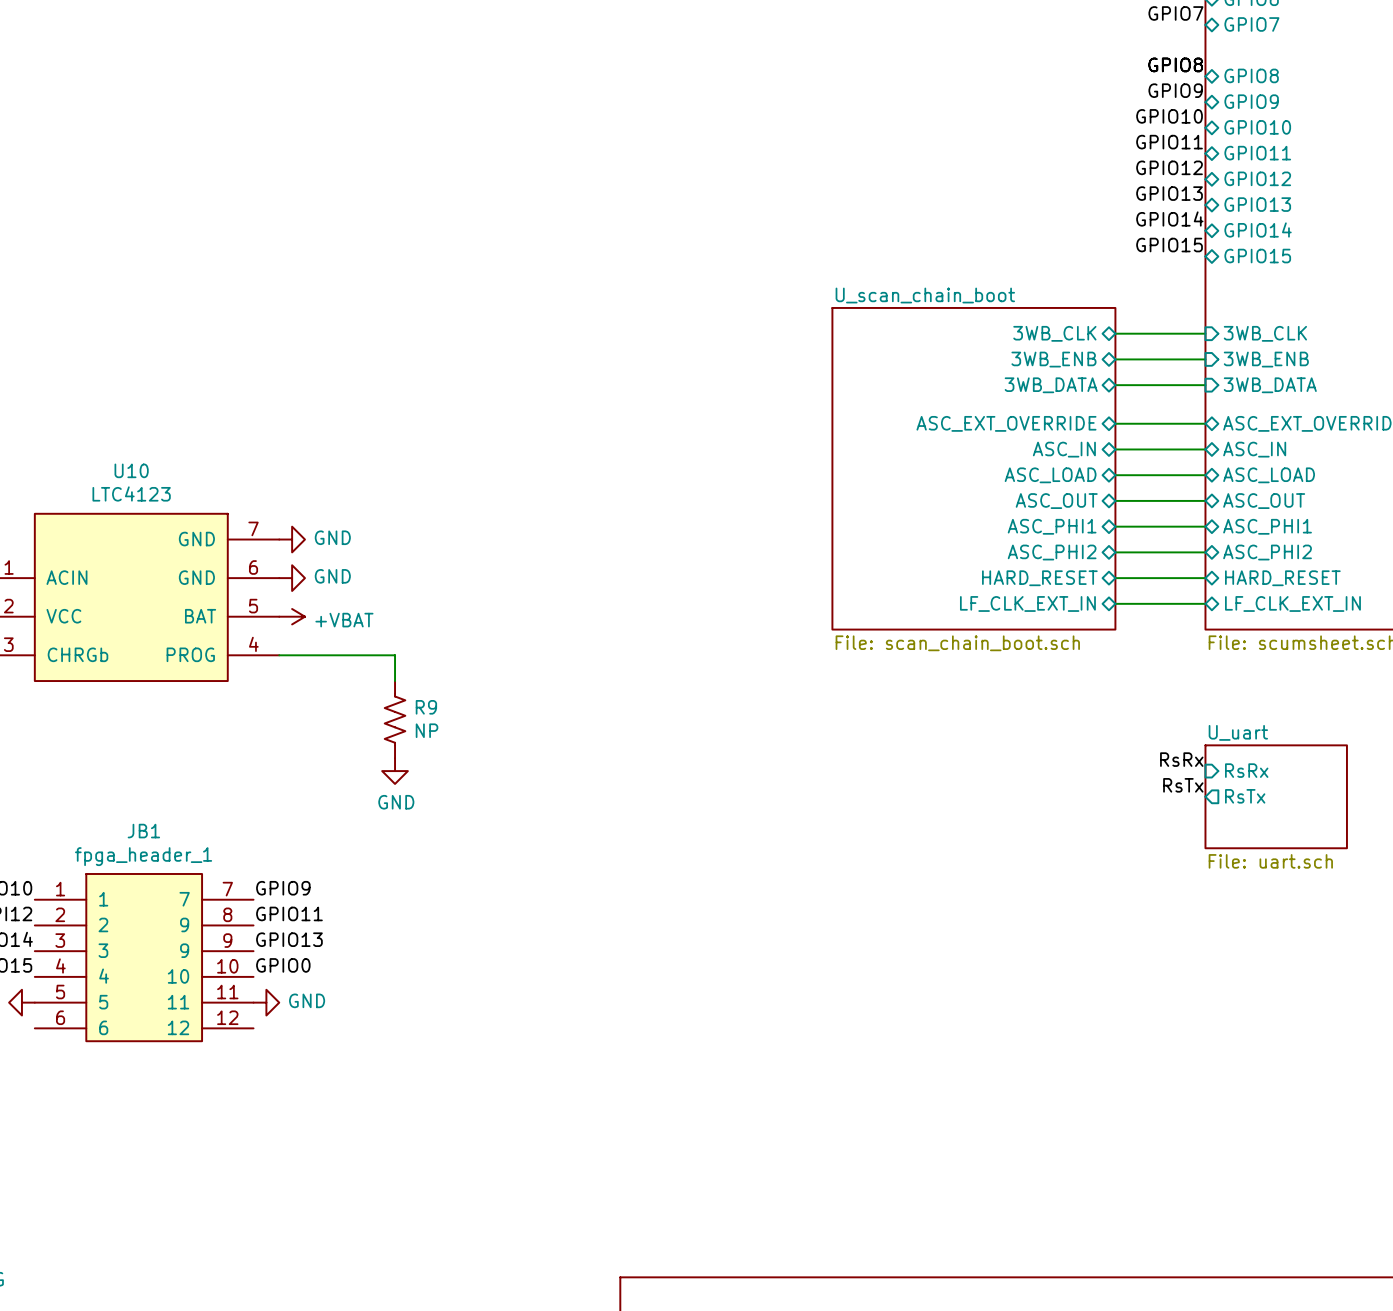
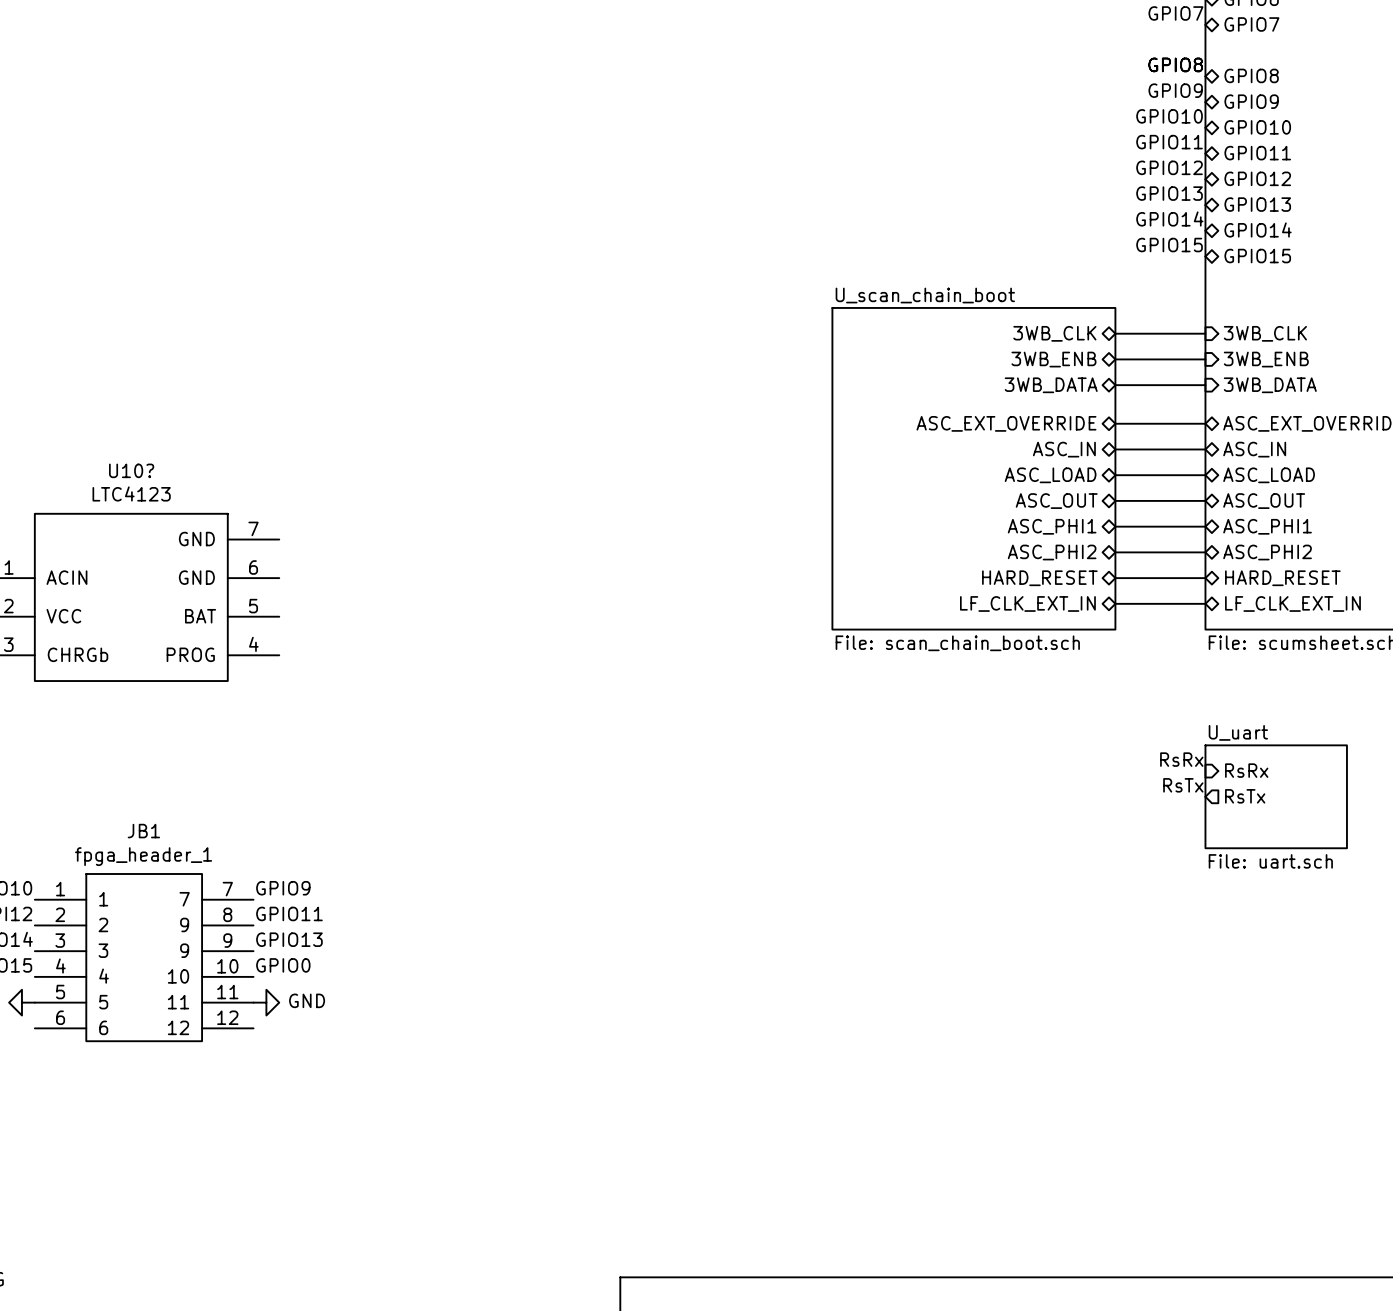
U10 name: U10 (131, 470) -> U10? (131, 470)
power symbol: GND (292, 539) -> none
power symbol: GND (292, 578) -> none
power symbol: +VBAT (292, 616) -> none
wire: (279, 655) (395, 655) (395, 681) -> none
R9: NP (395, 719) -> none
power symbol: GND (395, 771) -> none

